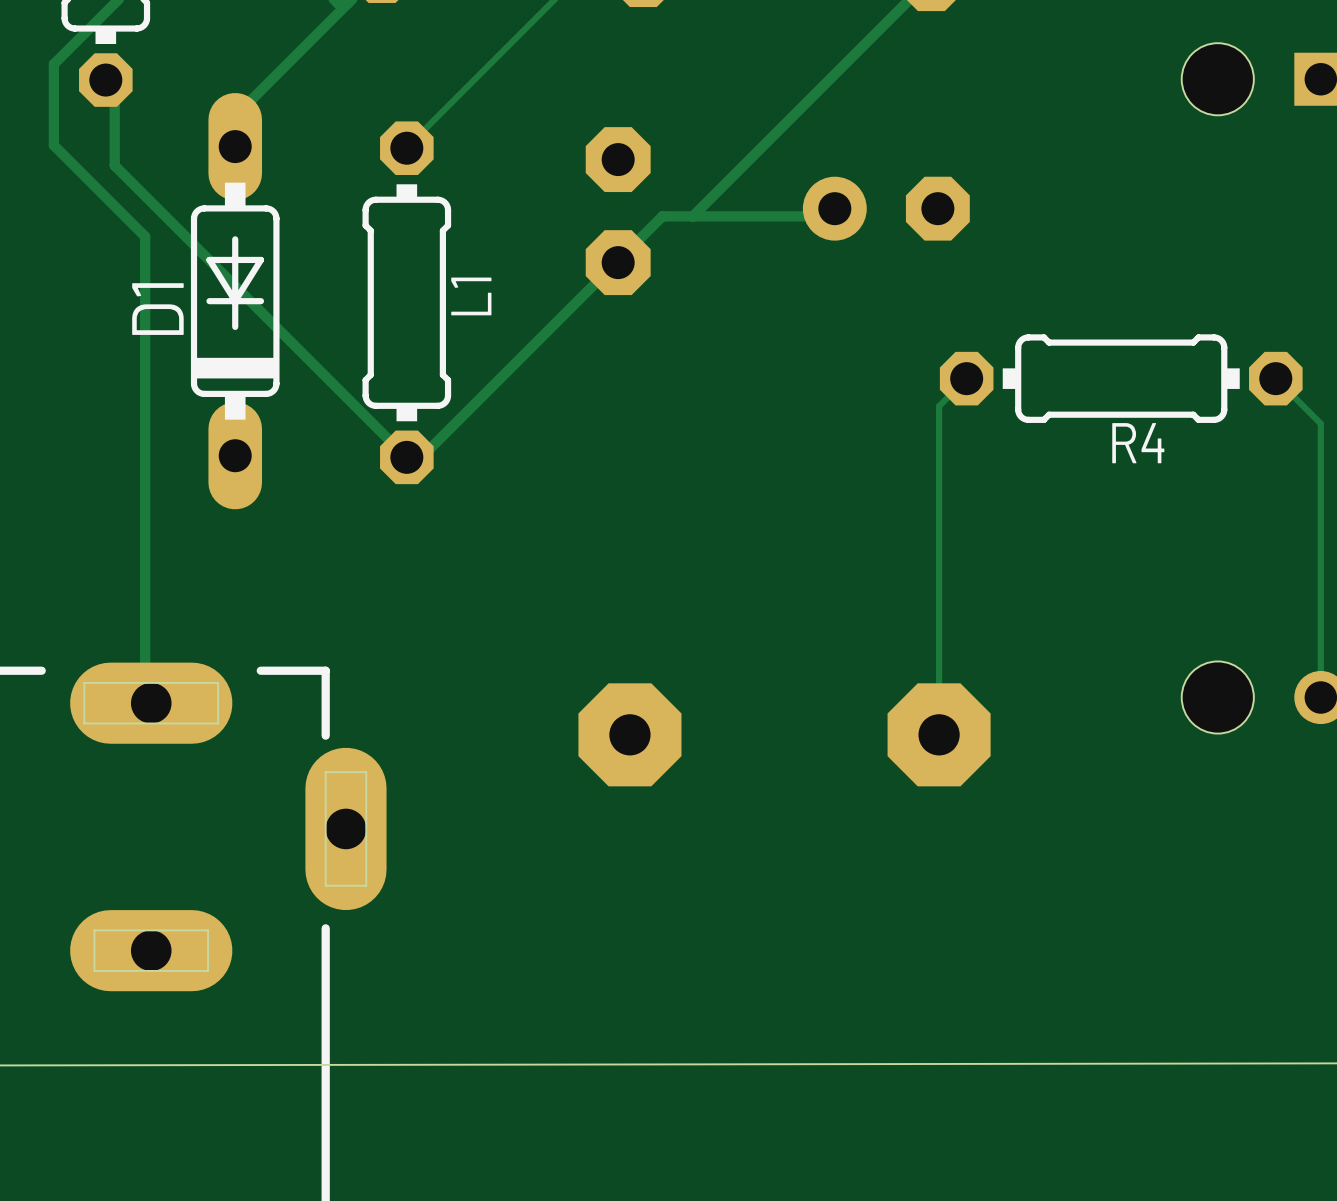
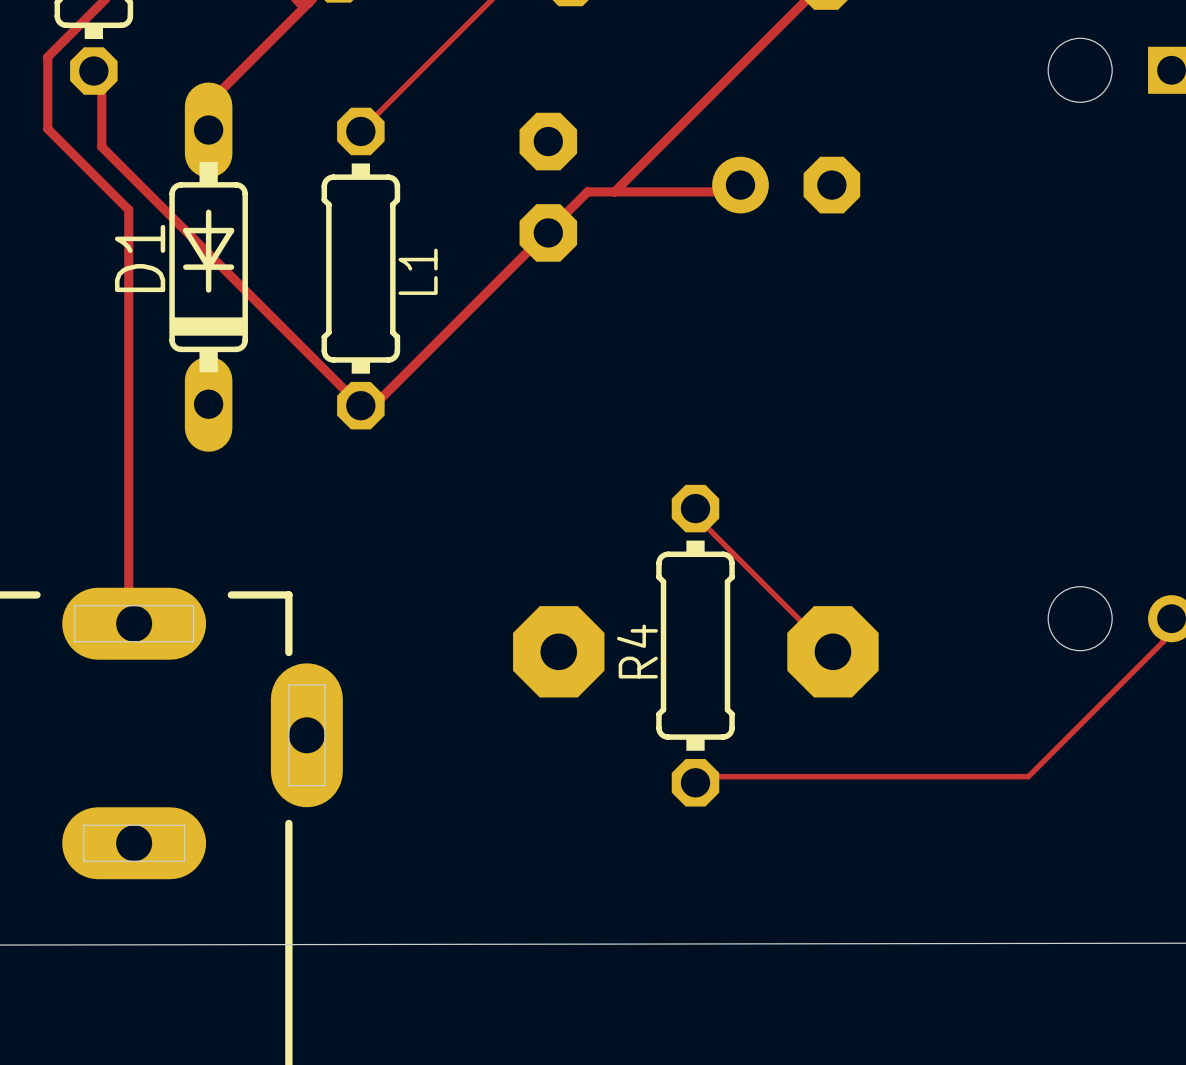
track: (966, 378) (939, 406) (939, 734) -> (695, 508) (695, 515) (832, 651)
R4 rotation: 0° (1121, 378) -> 90° clockwise (695, 645)
R4 position: (1121, 378) -> (695, 645)
track: (1275, 378) (1320, 423) (1320, 697) -> (695, 782) (695, 776) (1028, 776) (1163, 641) (1163, 623) (1171, 618)

